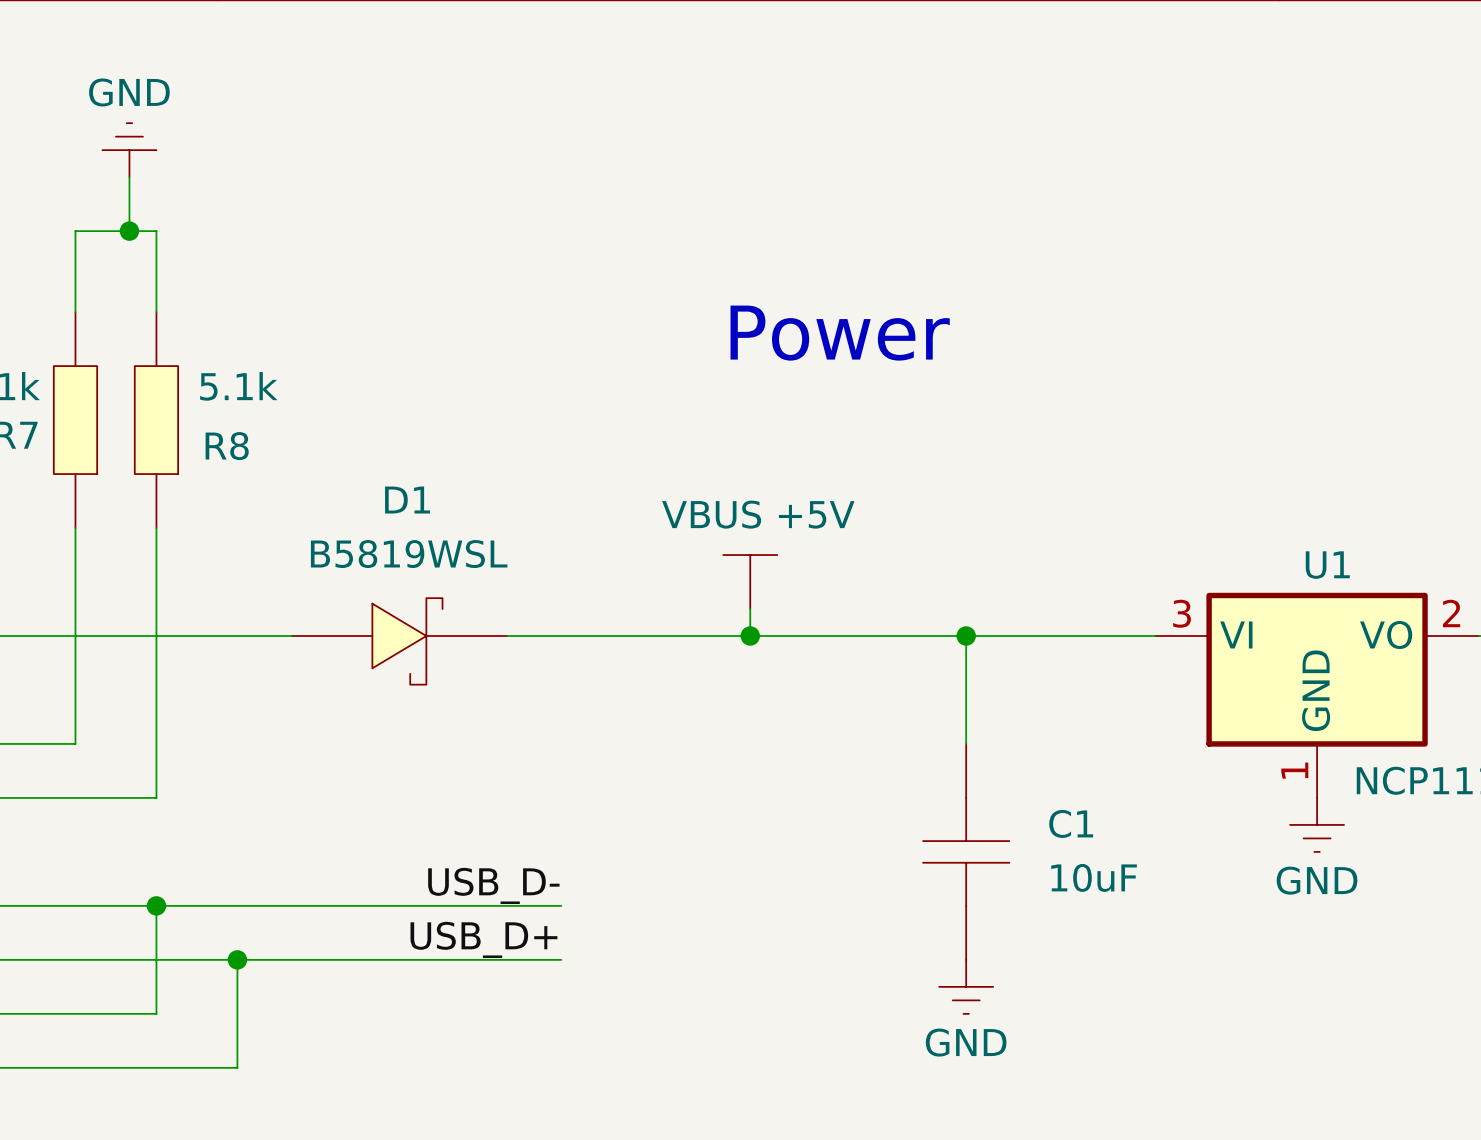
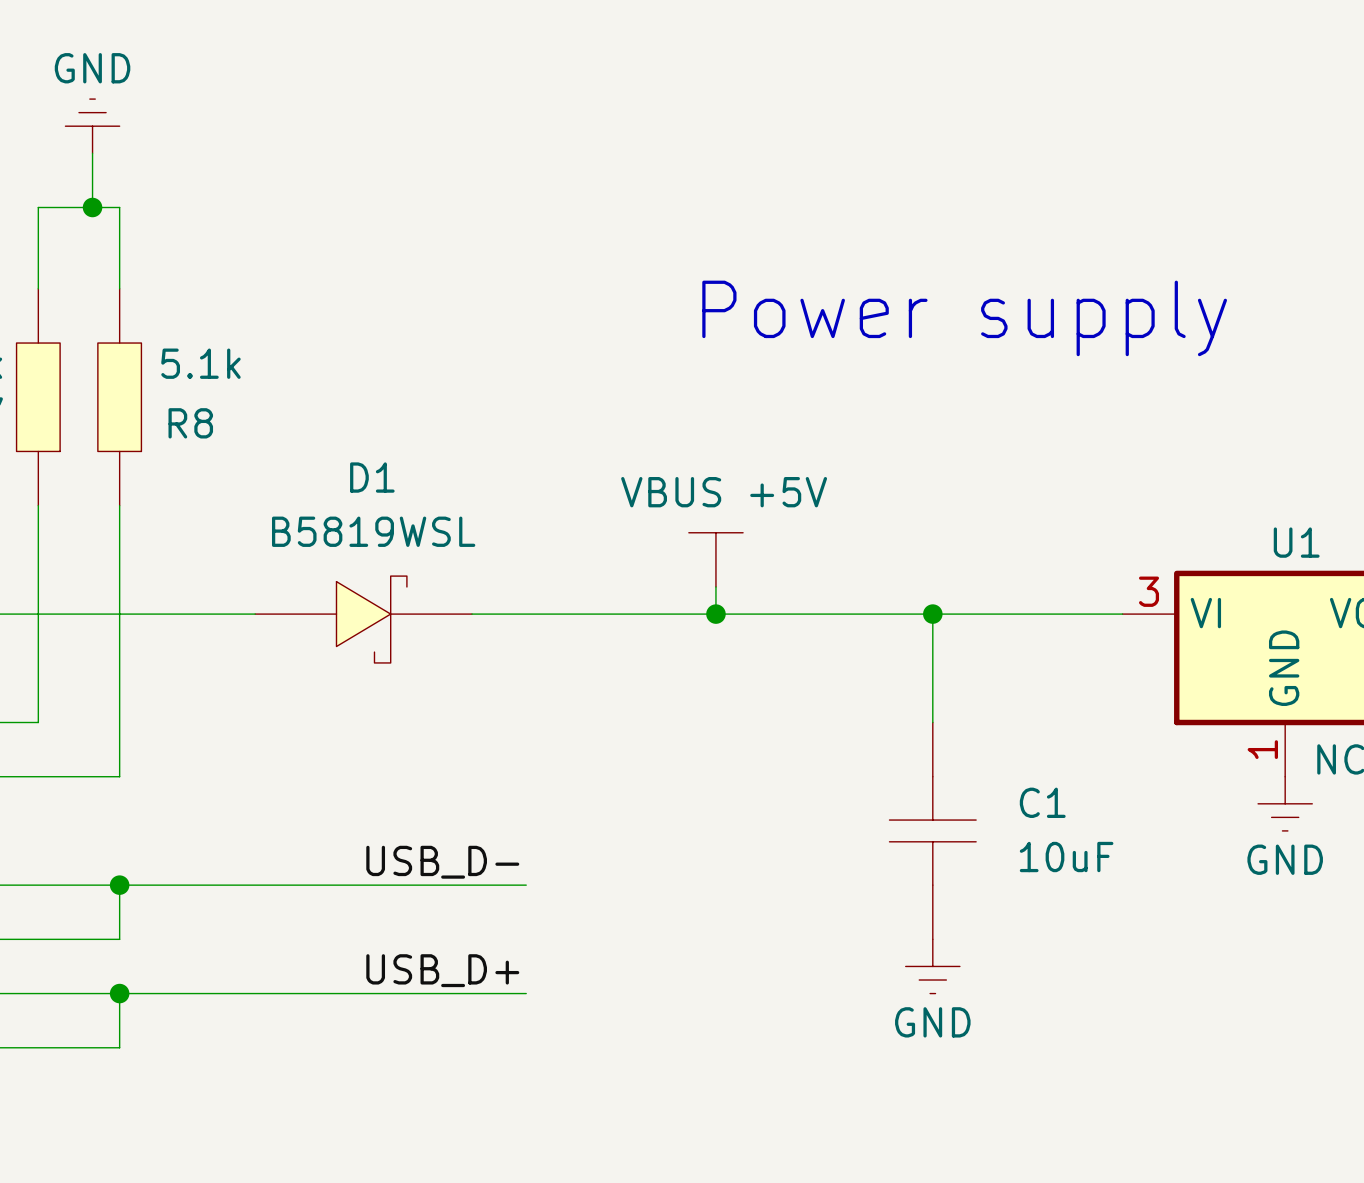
text: Power (840, 333) -> Power supply (964, 318)
label position: USB_D+ (483, 939) -> USB_D+ (442, 970)
wire: (237, 959) (237, 1067) (156, 1067) -> (526, 993) (119, 993) (119, 1047)
junction position: (237, 959) -> (119, 993)
wire: (561, 959) (156, 959) (156, 1013) -> none

